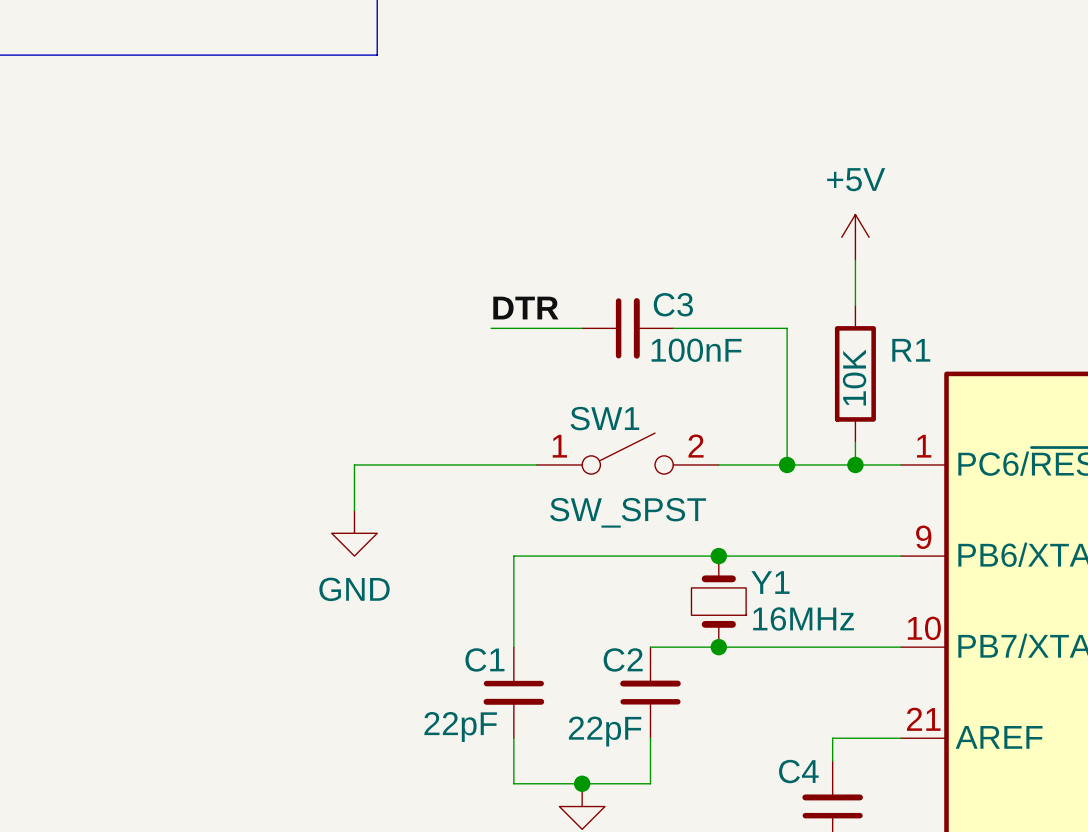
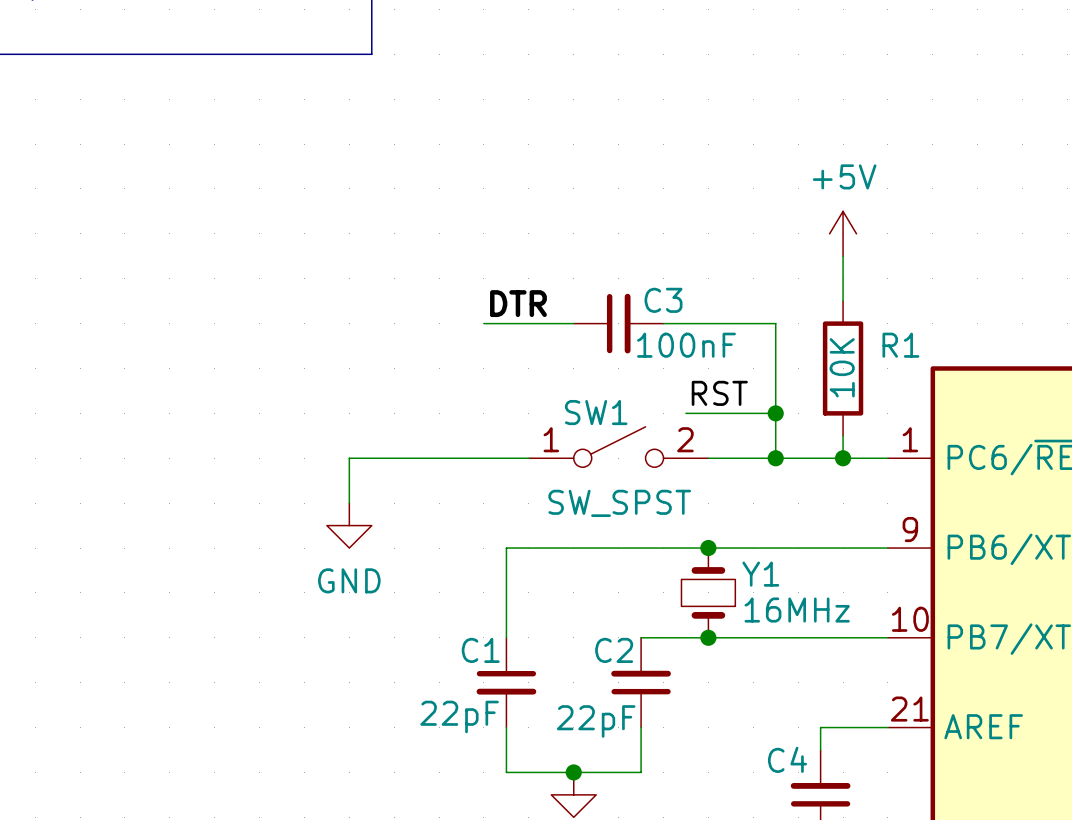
label: none -> RST (719, 393)
wire: none -> (685, 413) (775, 413)
junction: none -> (775, 413)

